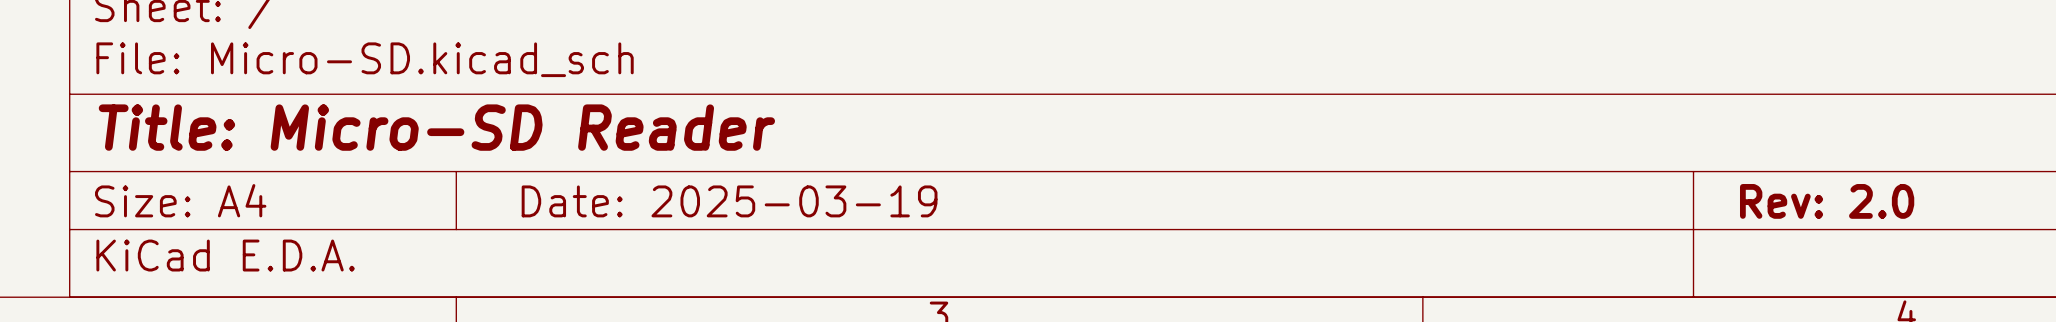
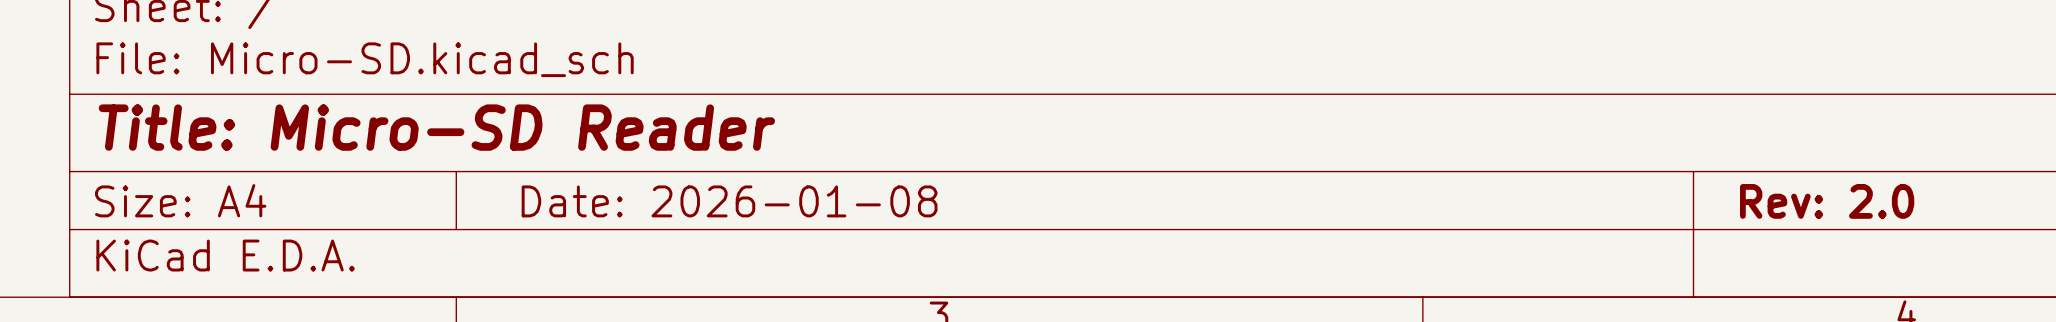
title block: Date: 2025-03-19 (729, 201) -> Date: 2026-01-08 (729, 201)

